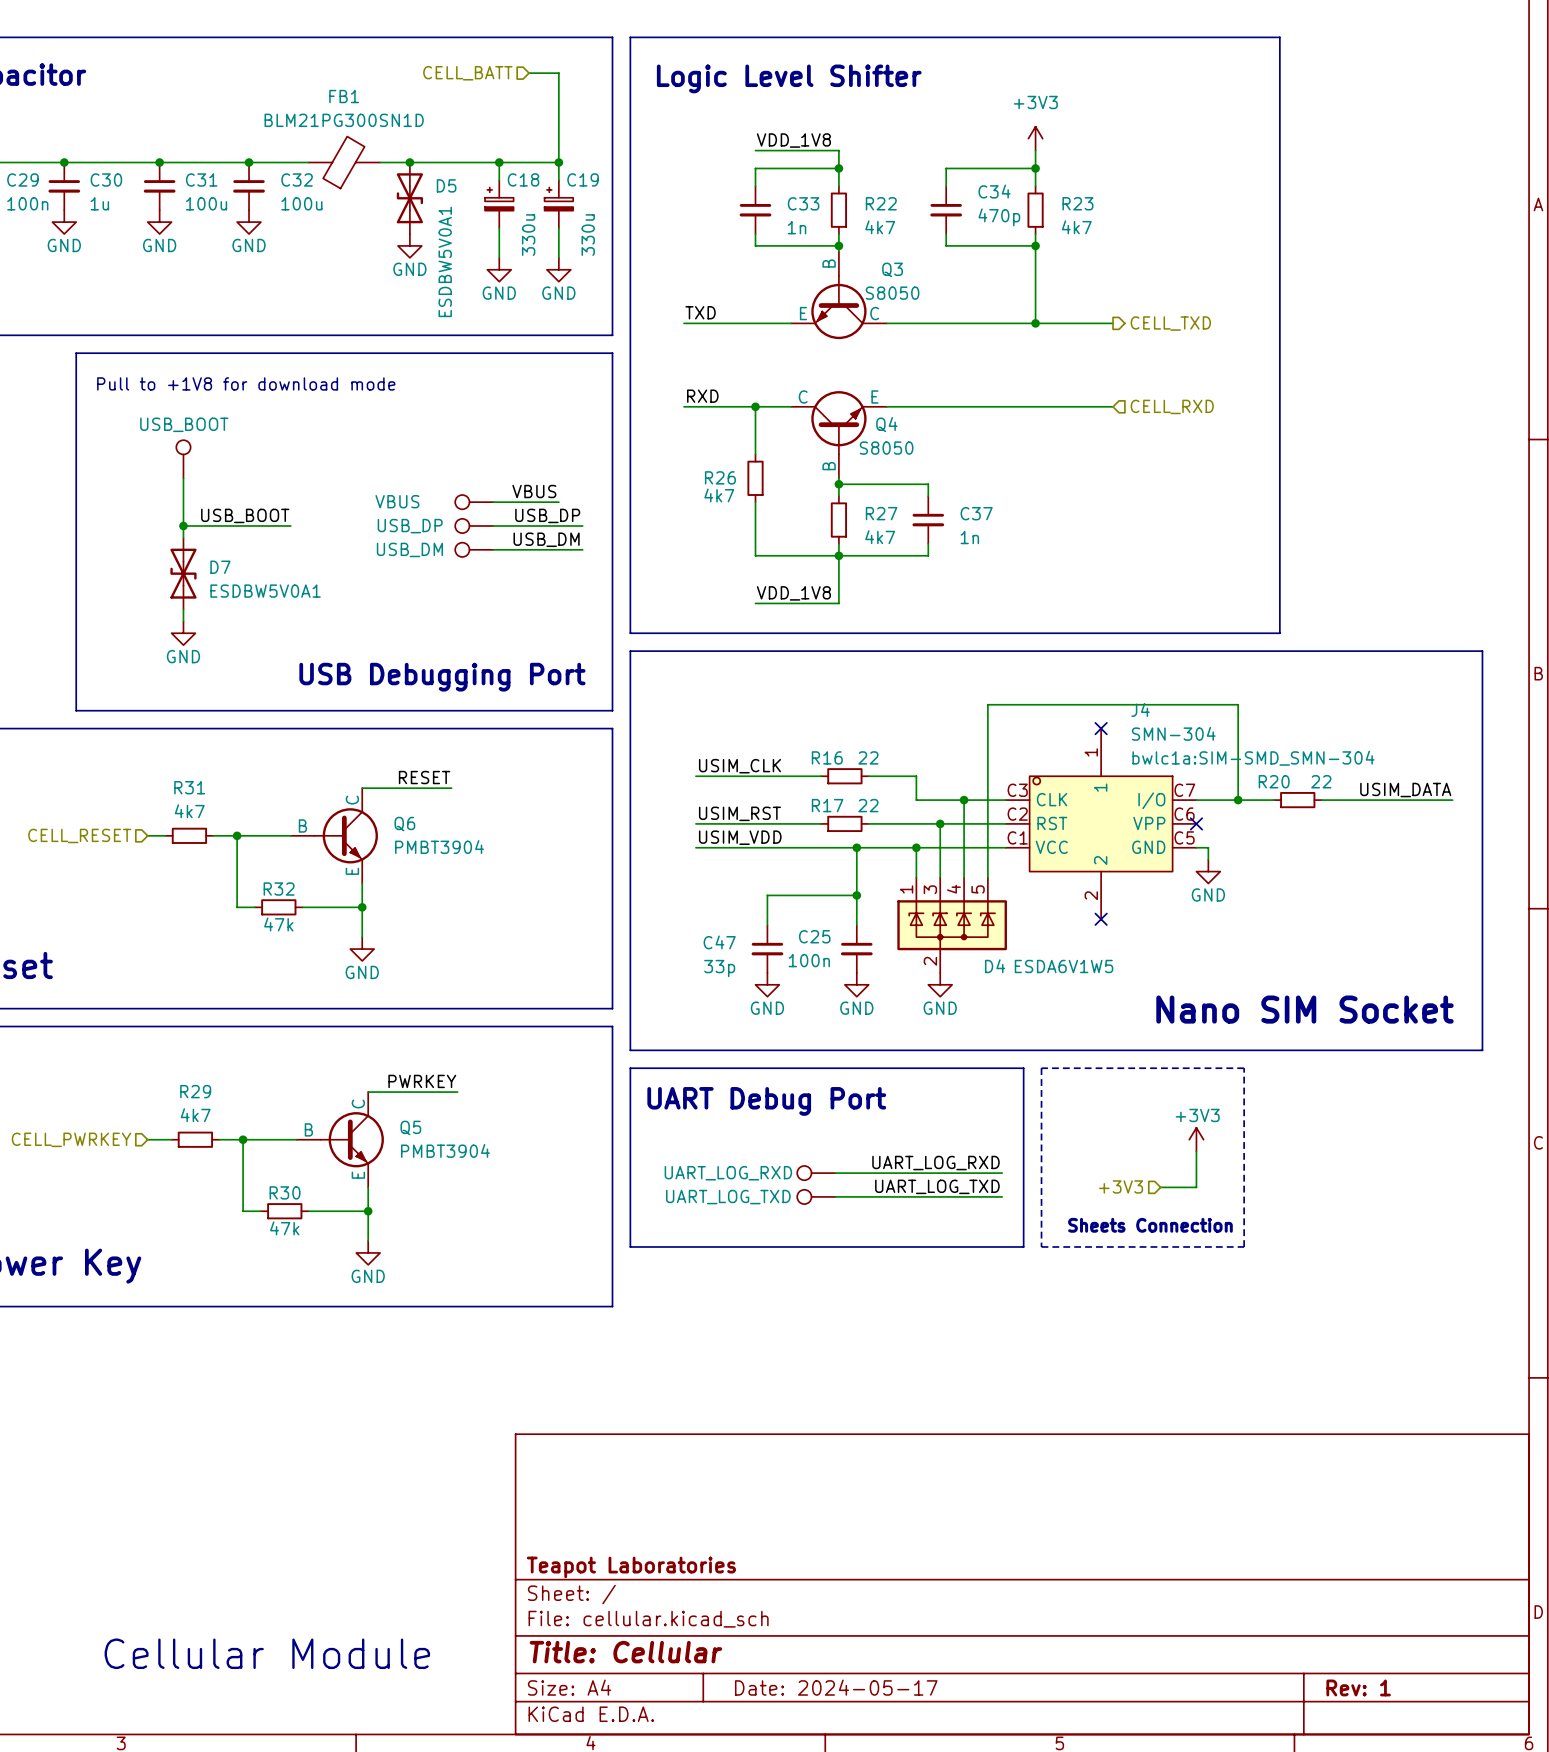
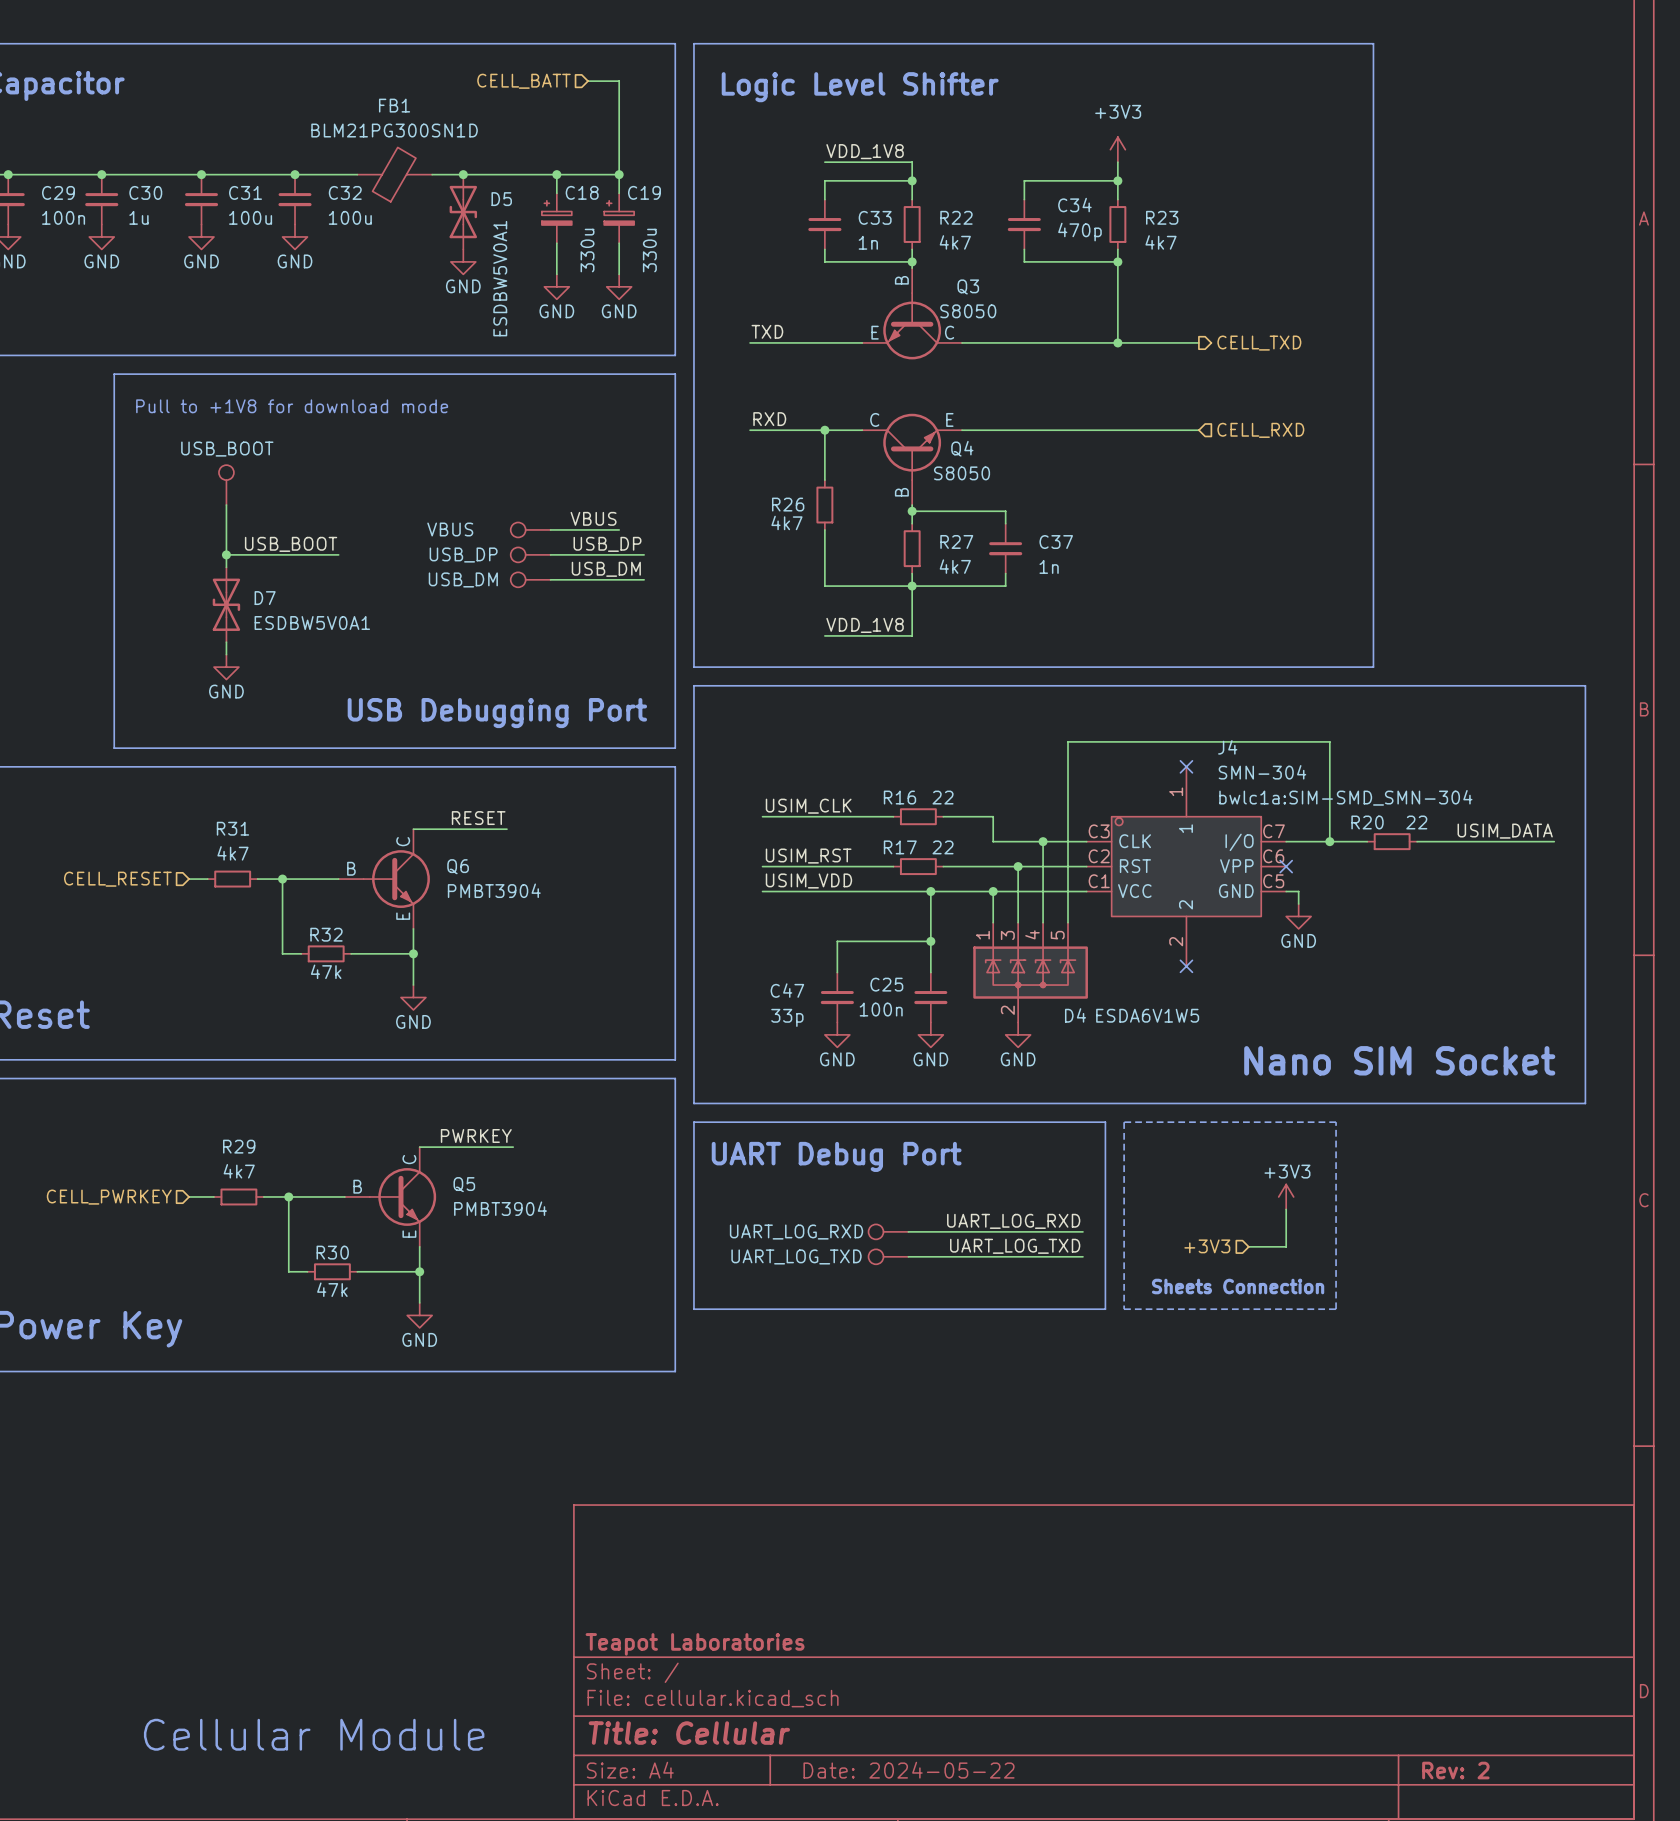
title block: Date: 2024-05-17 (836, 1687) -> Date: 2024-05-22 (909, 1770)
title block: Rev: 1 (1358, 1687) -> Rev: 2 (1455, 1770)

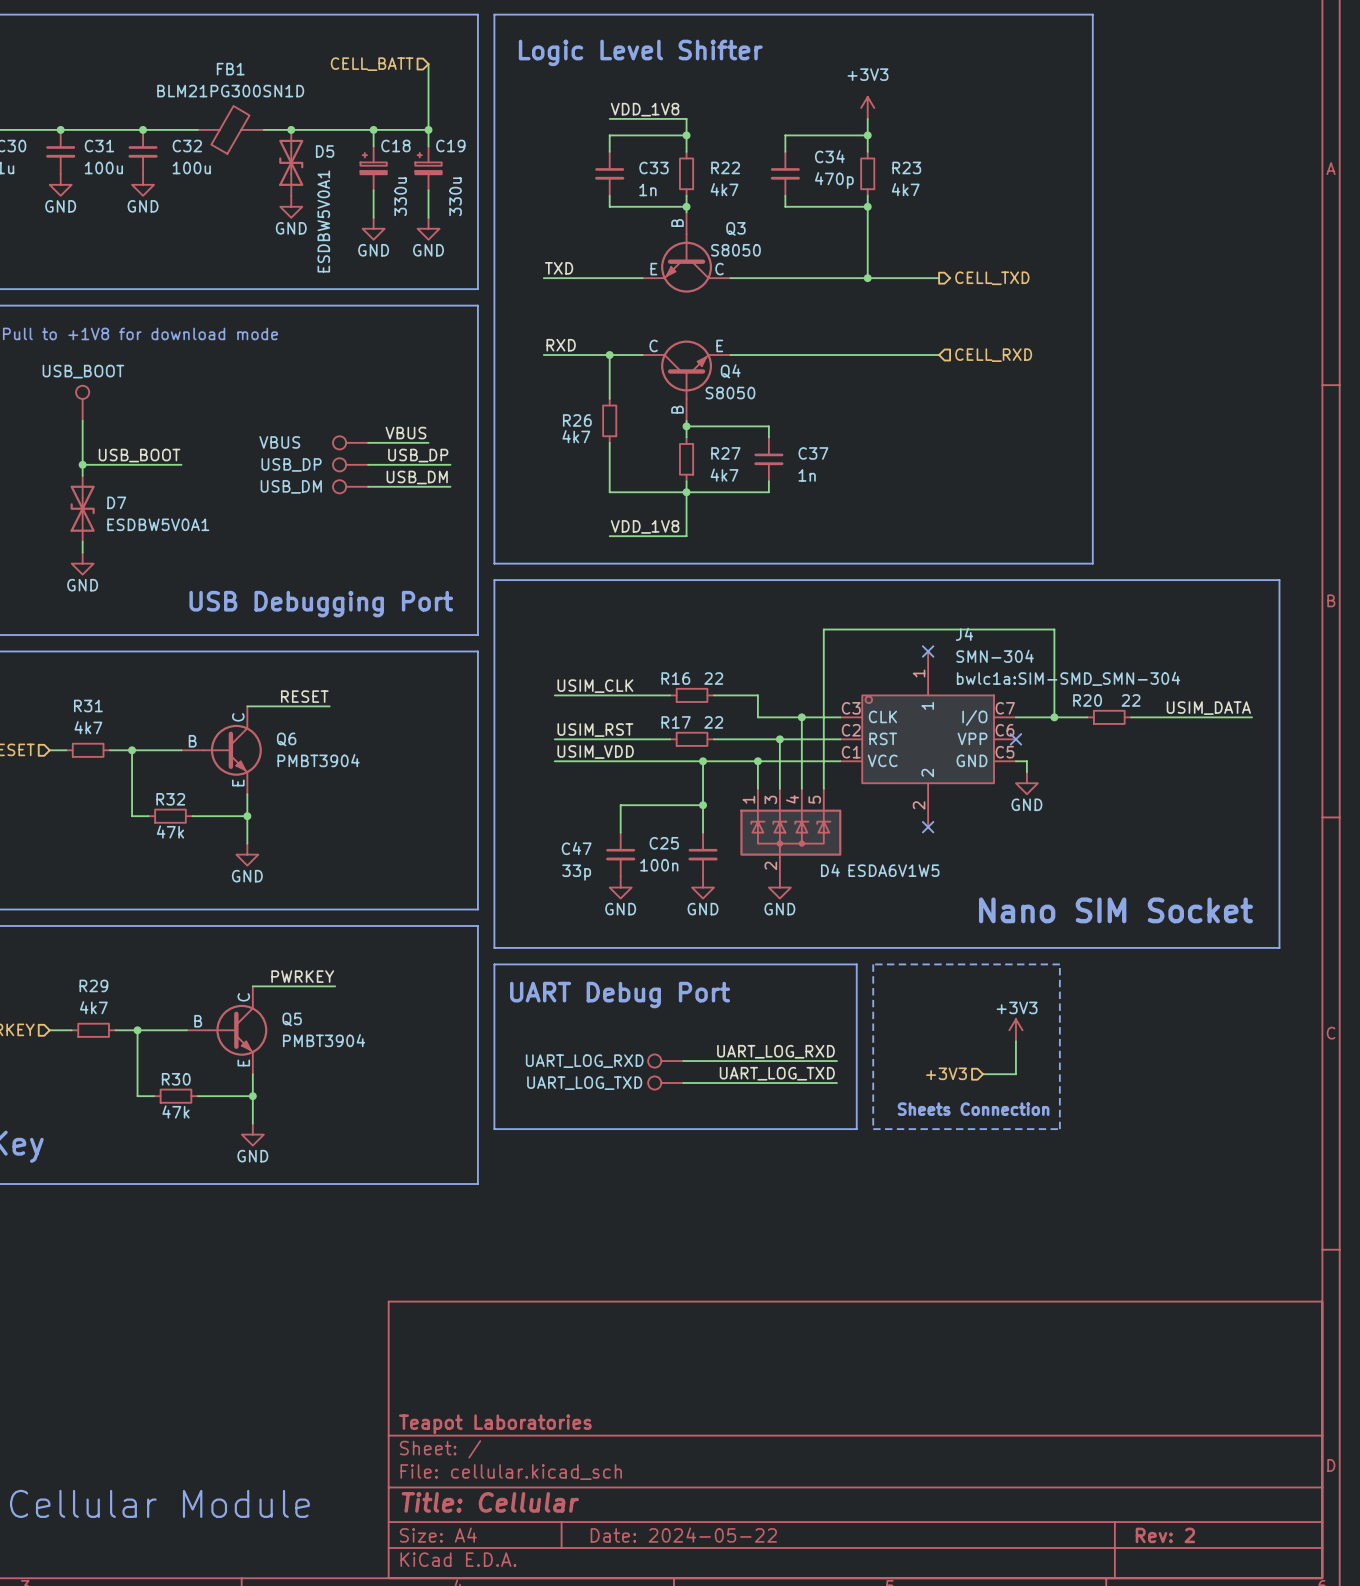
hierarchical label position: CELL_BATT (523, 81) -> CELL_BATT (372, 64)
wire: (588, 81) (619, 81) (619, 99) -> none

